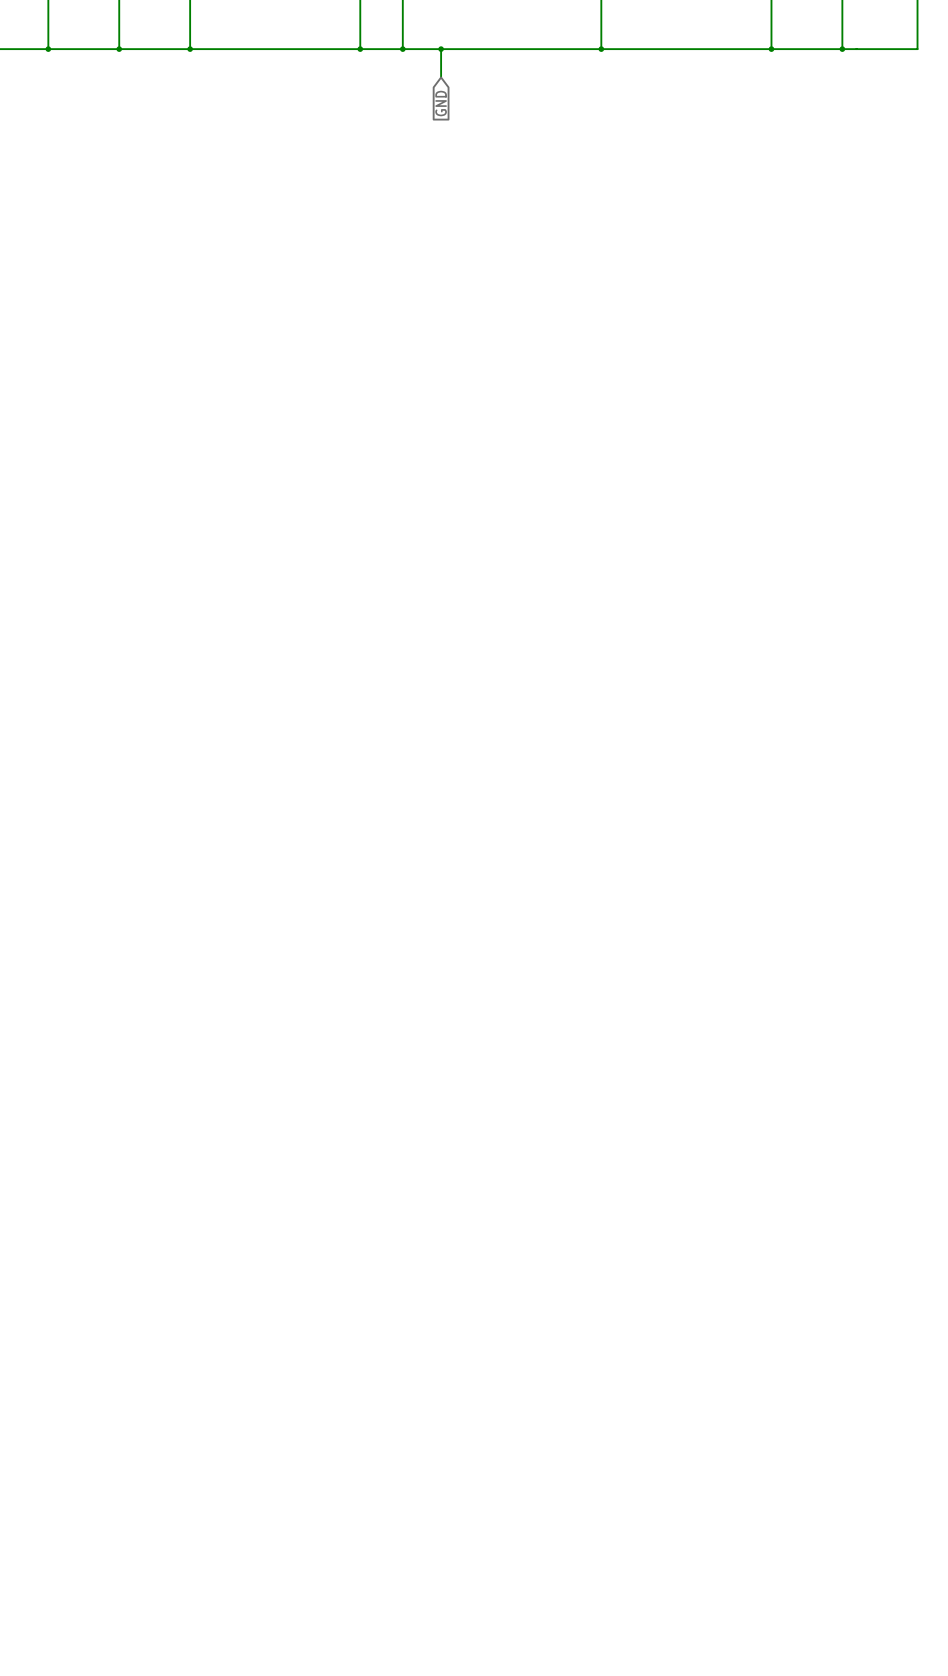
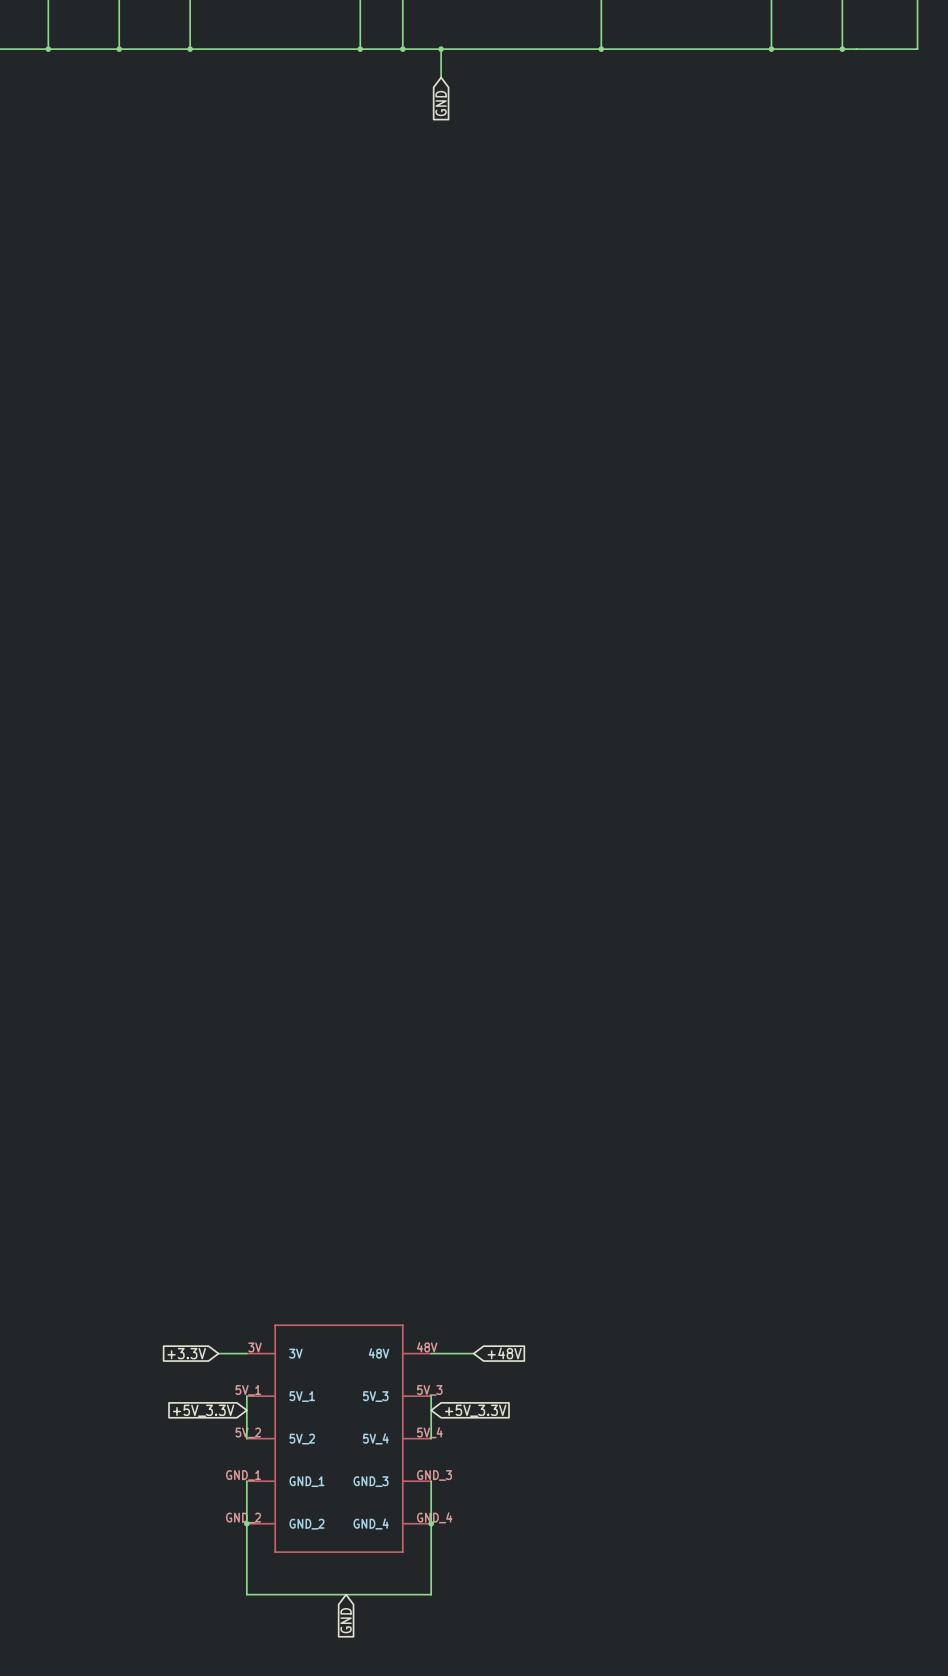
global label: none -> +3.3V (186, 1353)
wire: none -> (218, 1353) (246, 1353)
wire: none -> (431, 1353) (473, 1353)
global label: none -> +48V (504, 1353)
wire: none -> (246, 1396) (246, 1438)
wire: none -> (431, 1396) (431, 1438)
global label: none -> +5V_3.3V (203, 1410)
global label: none -> +5V_3.3V (475, 1410)
part: none -> (339, 1438)
wire: none -> (246, 1481) (246, 1594) (431, 1594) (431, 1481)
junction: none -> (246, 1523)
junction: none -> (431, 1523)
global label: none -> GND (346, 1620)

